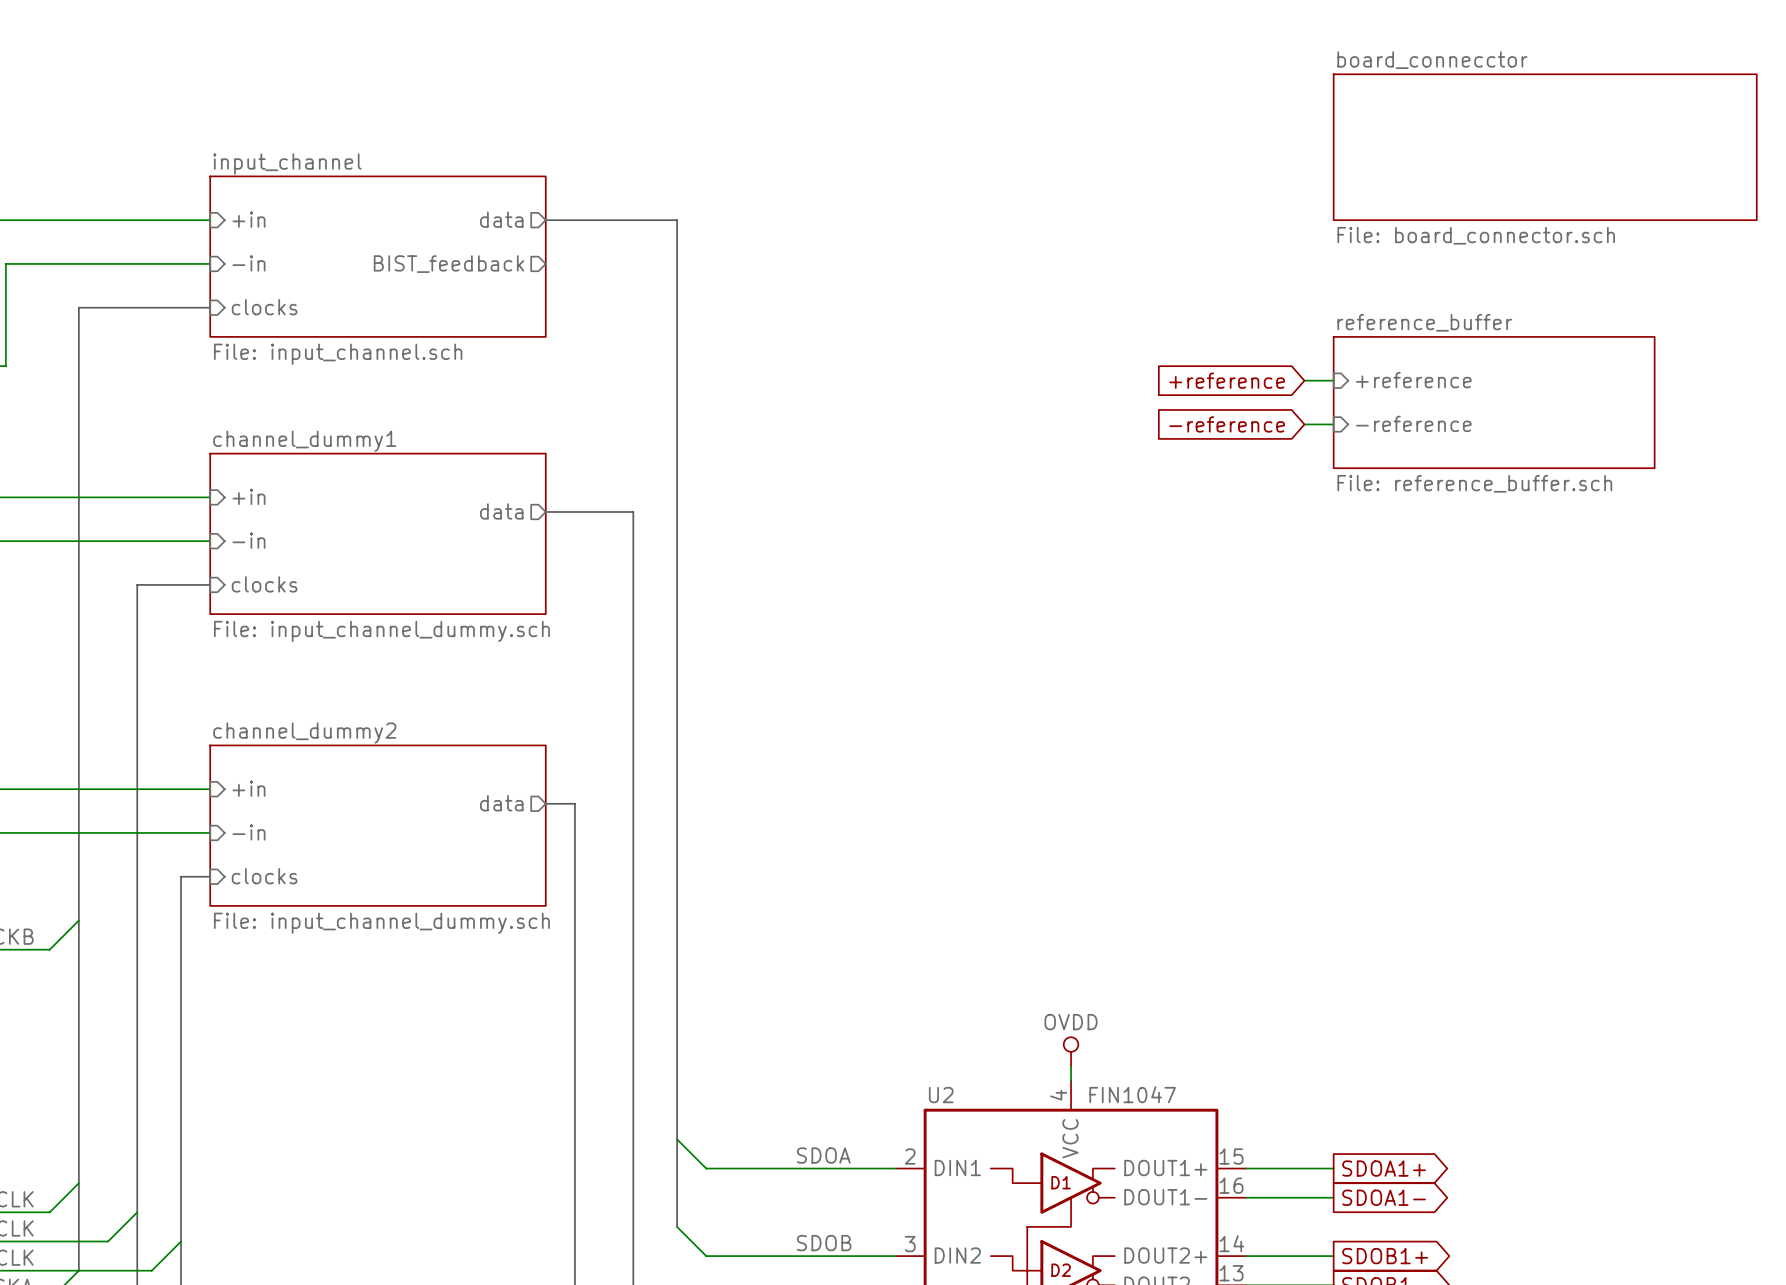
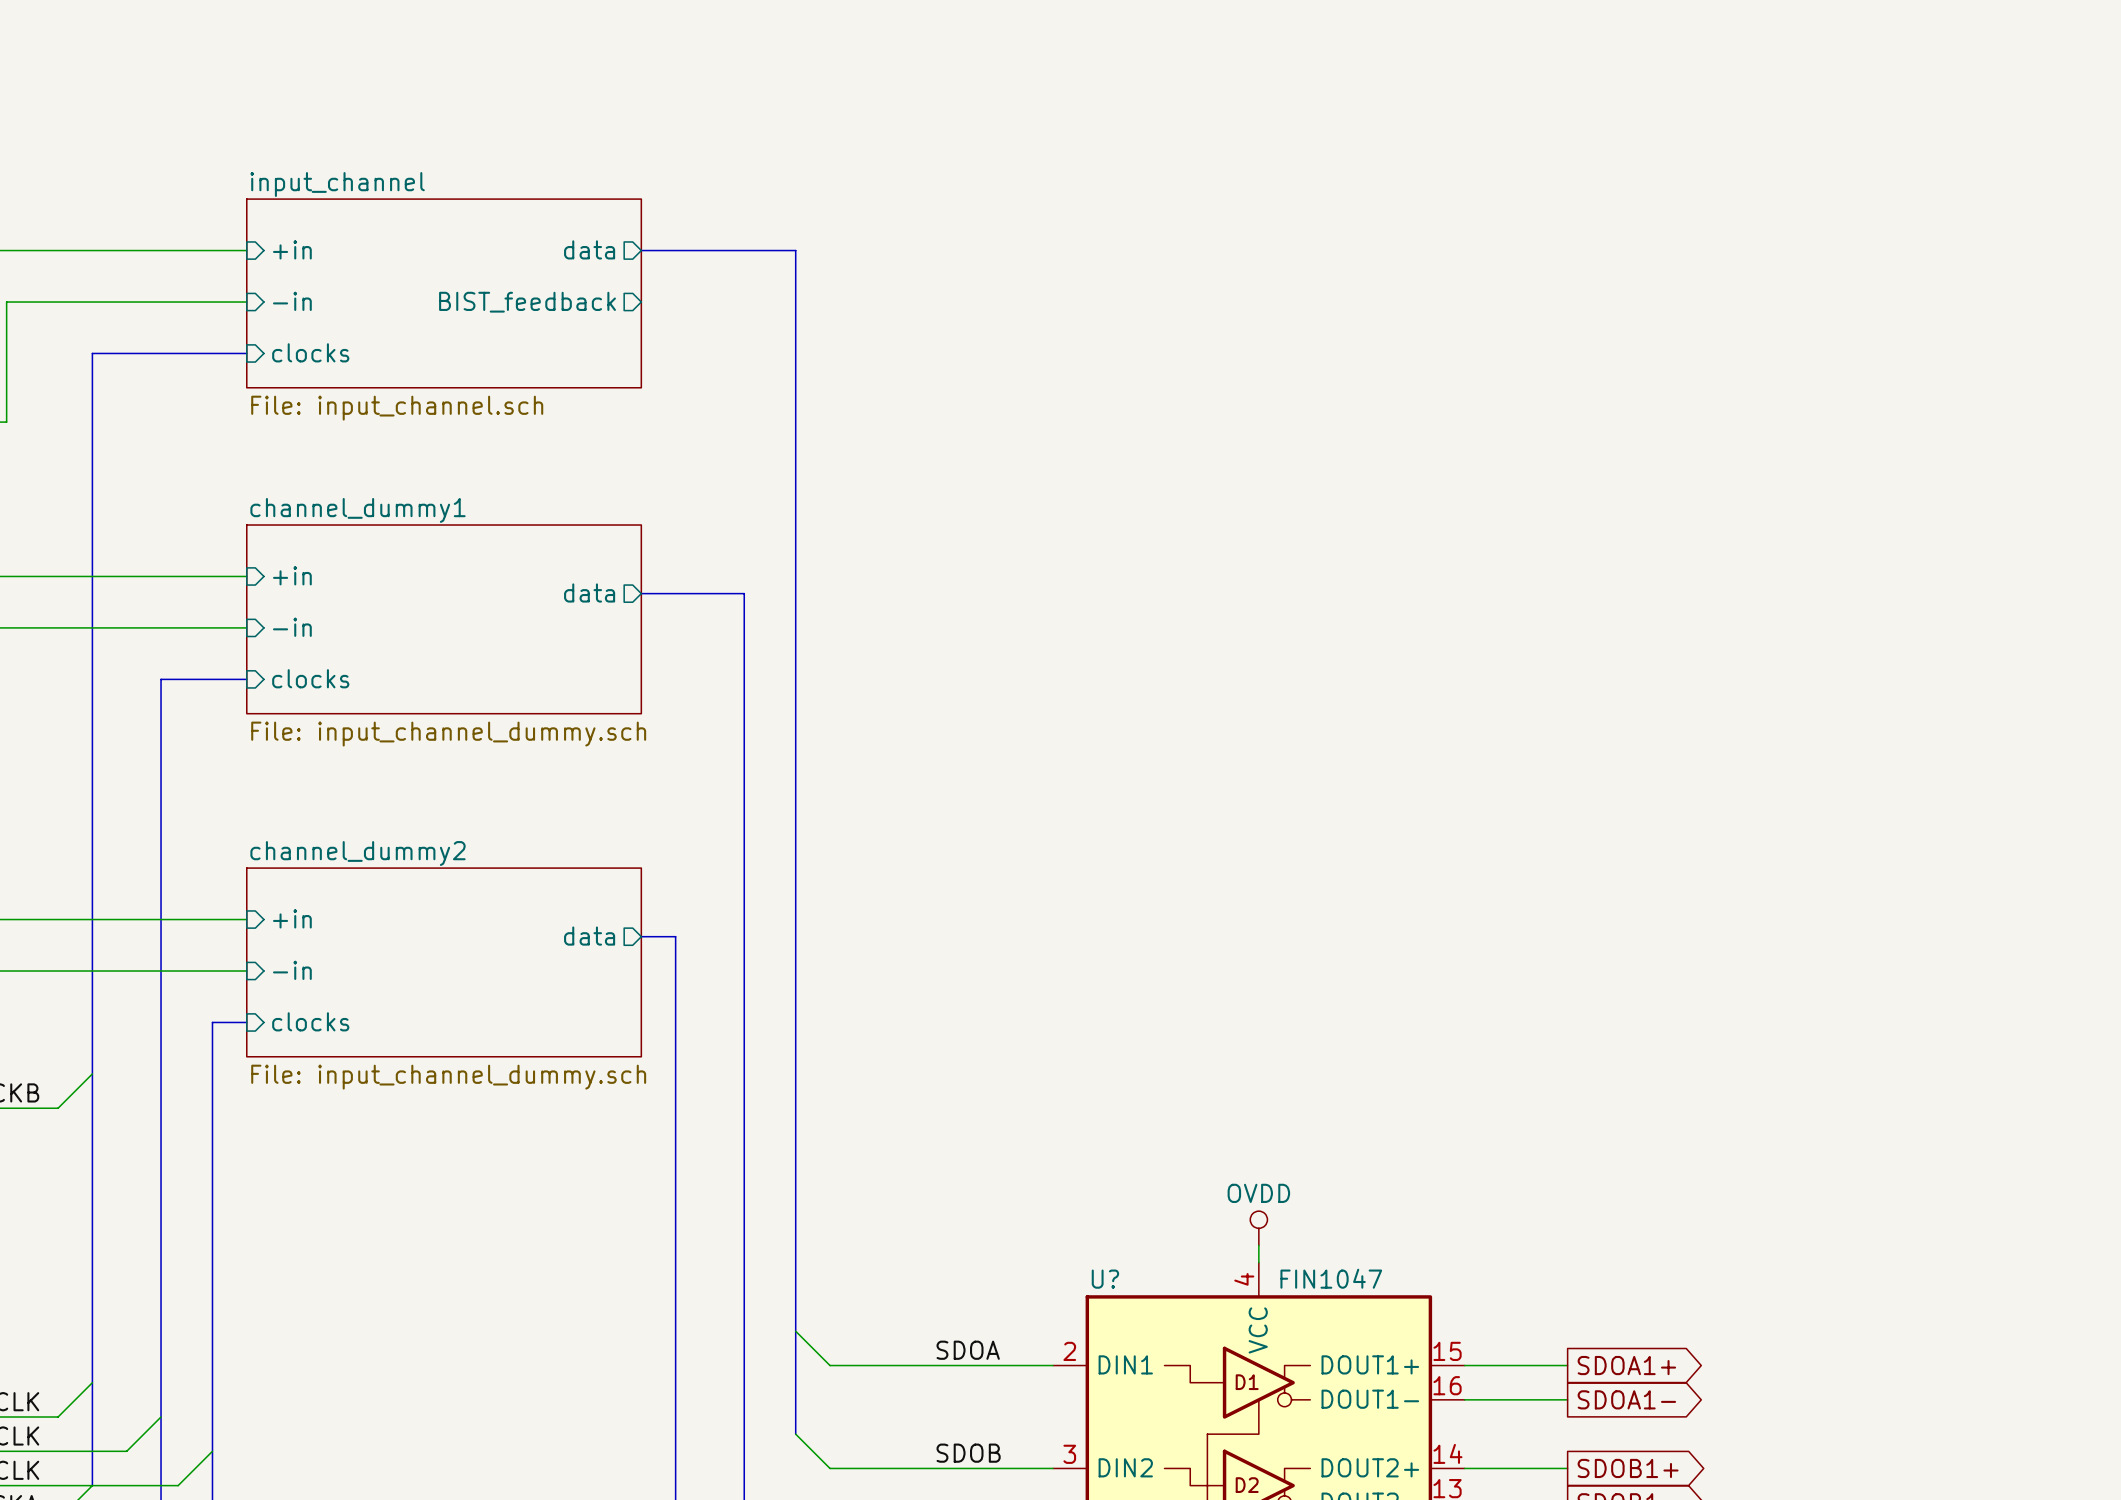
sheet board_connecctor: File: board_connector.sch (1545, 147) -> none
global label: +reference (1227, 380) -> none
wire: (1304, 380) (1333, 380) -> none
sheet pin: +reference (1413, 380) -> none
sheet reference_buffer: File: reference_buffer.sch (1494, 402) -> none
sheet pin: -reference (1413, 423) -> none
global label: -reference (1227, 424) -> none
wire: (1304, 424) (1333, 424) -> none
U2 name: U2 (941, 1095) -> U? (1105, 1279)

